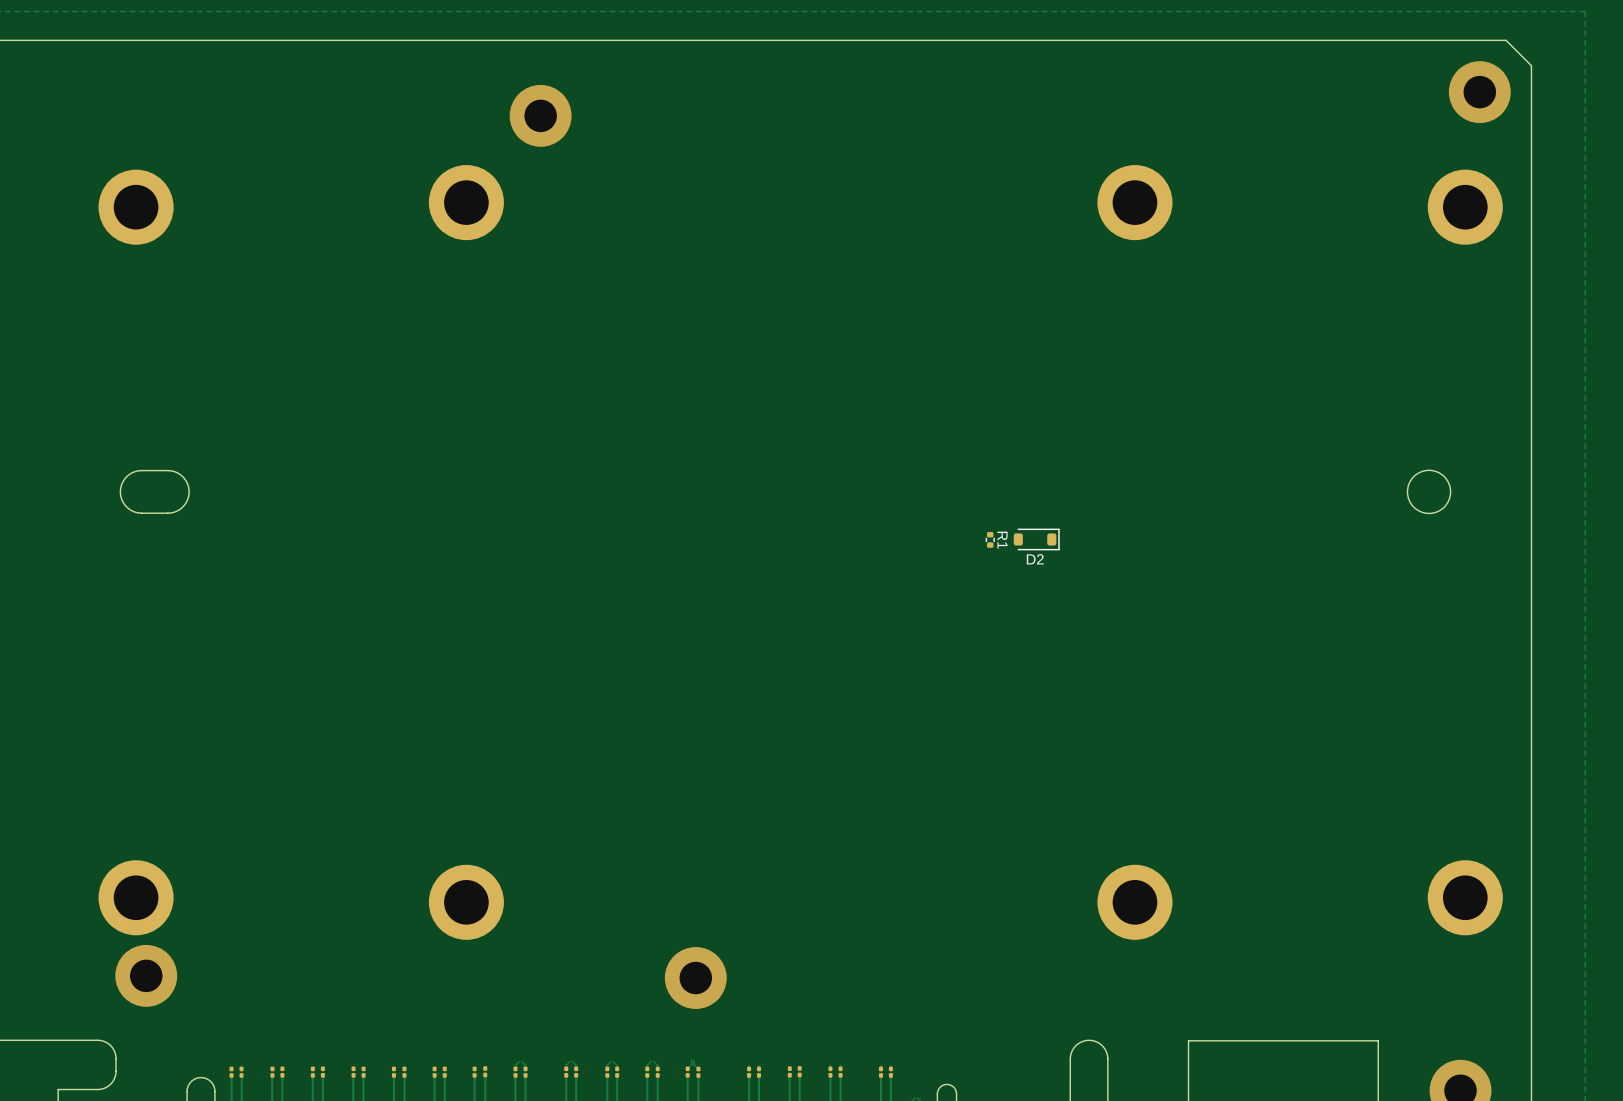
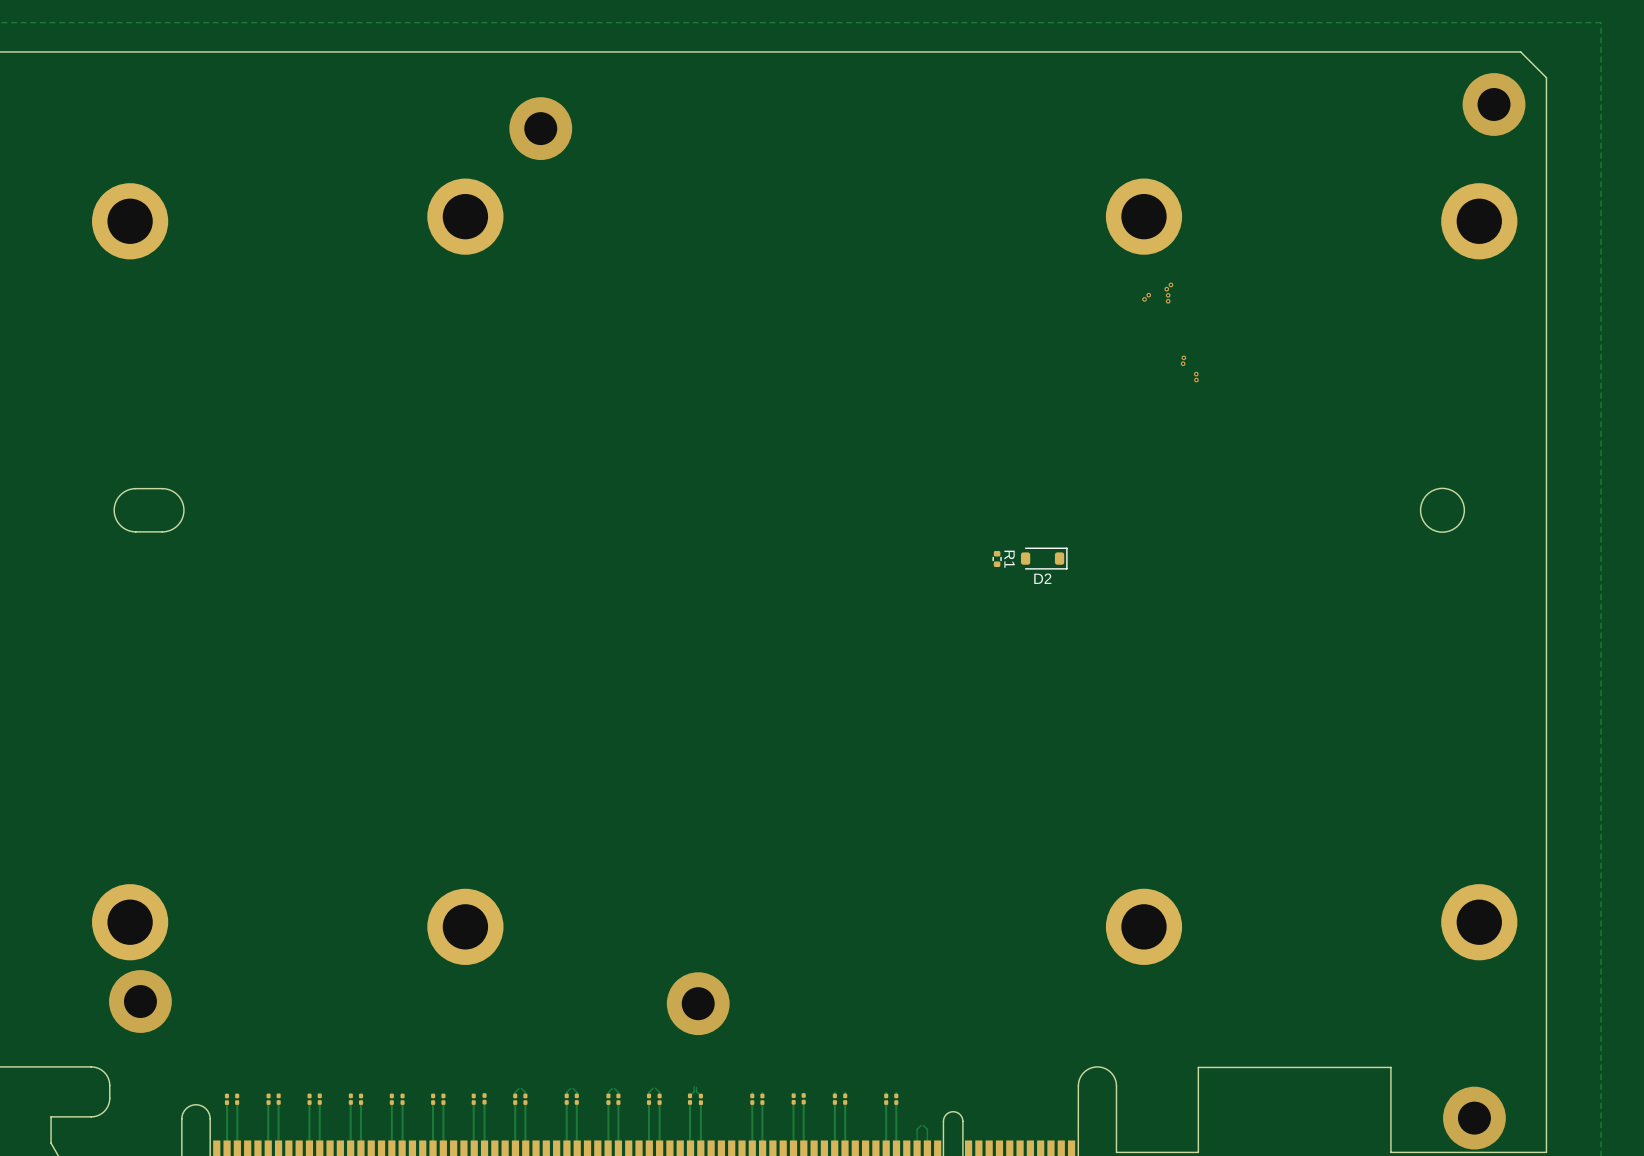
via: none -> (1170, 284)
via: none -> (1166, 289)
via: none -> (1148, 295)
via: none -> (1168, 295)
via: none -> (1144, 299)
via: none -> (1168, 301)
via: none -> (1183, 357)
via: none -> (1183, 363)
via: none -> (1196, 374)
via: none -> (1196, 380)

